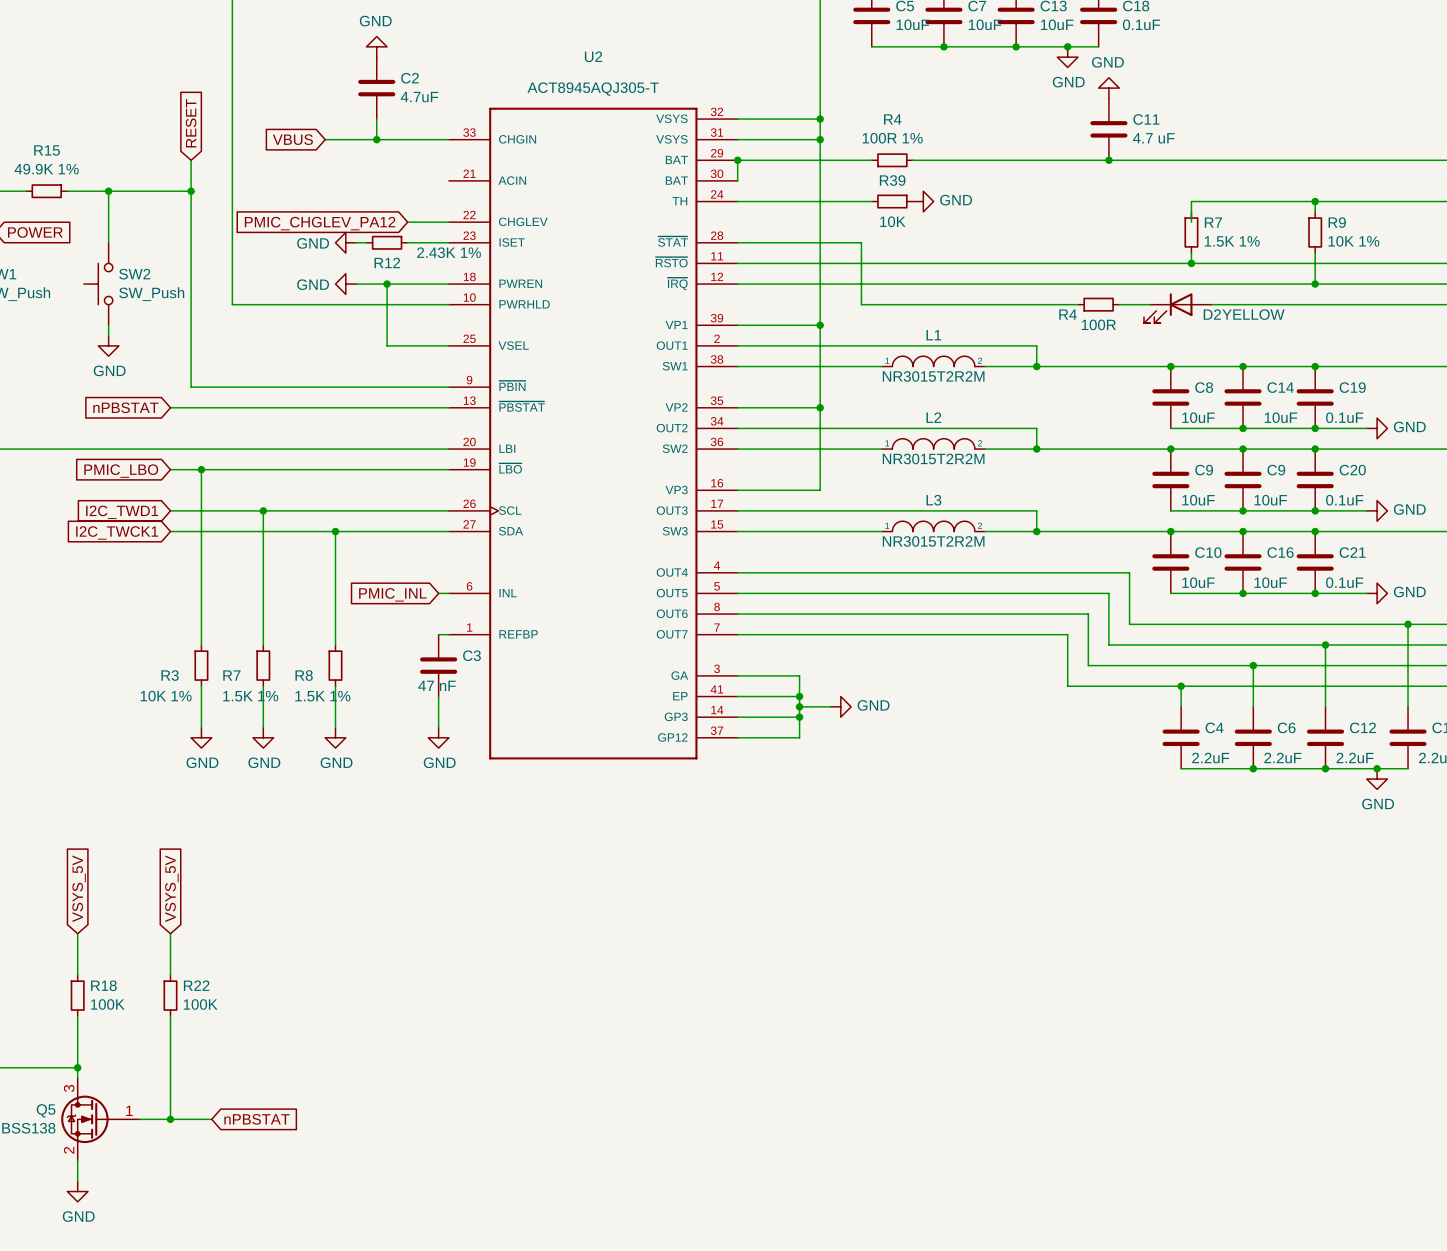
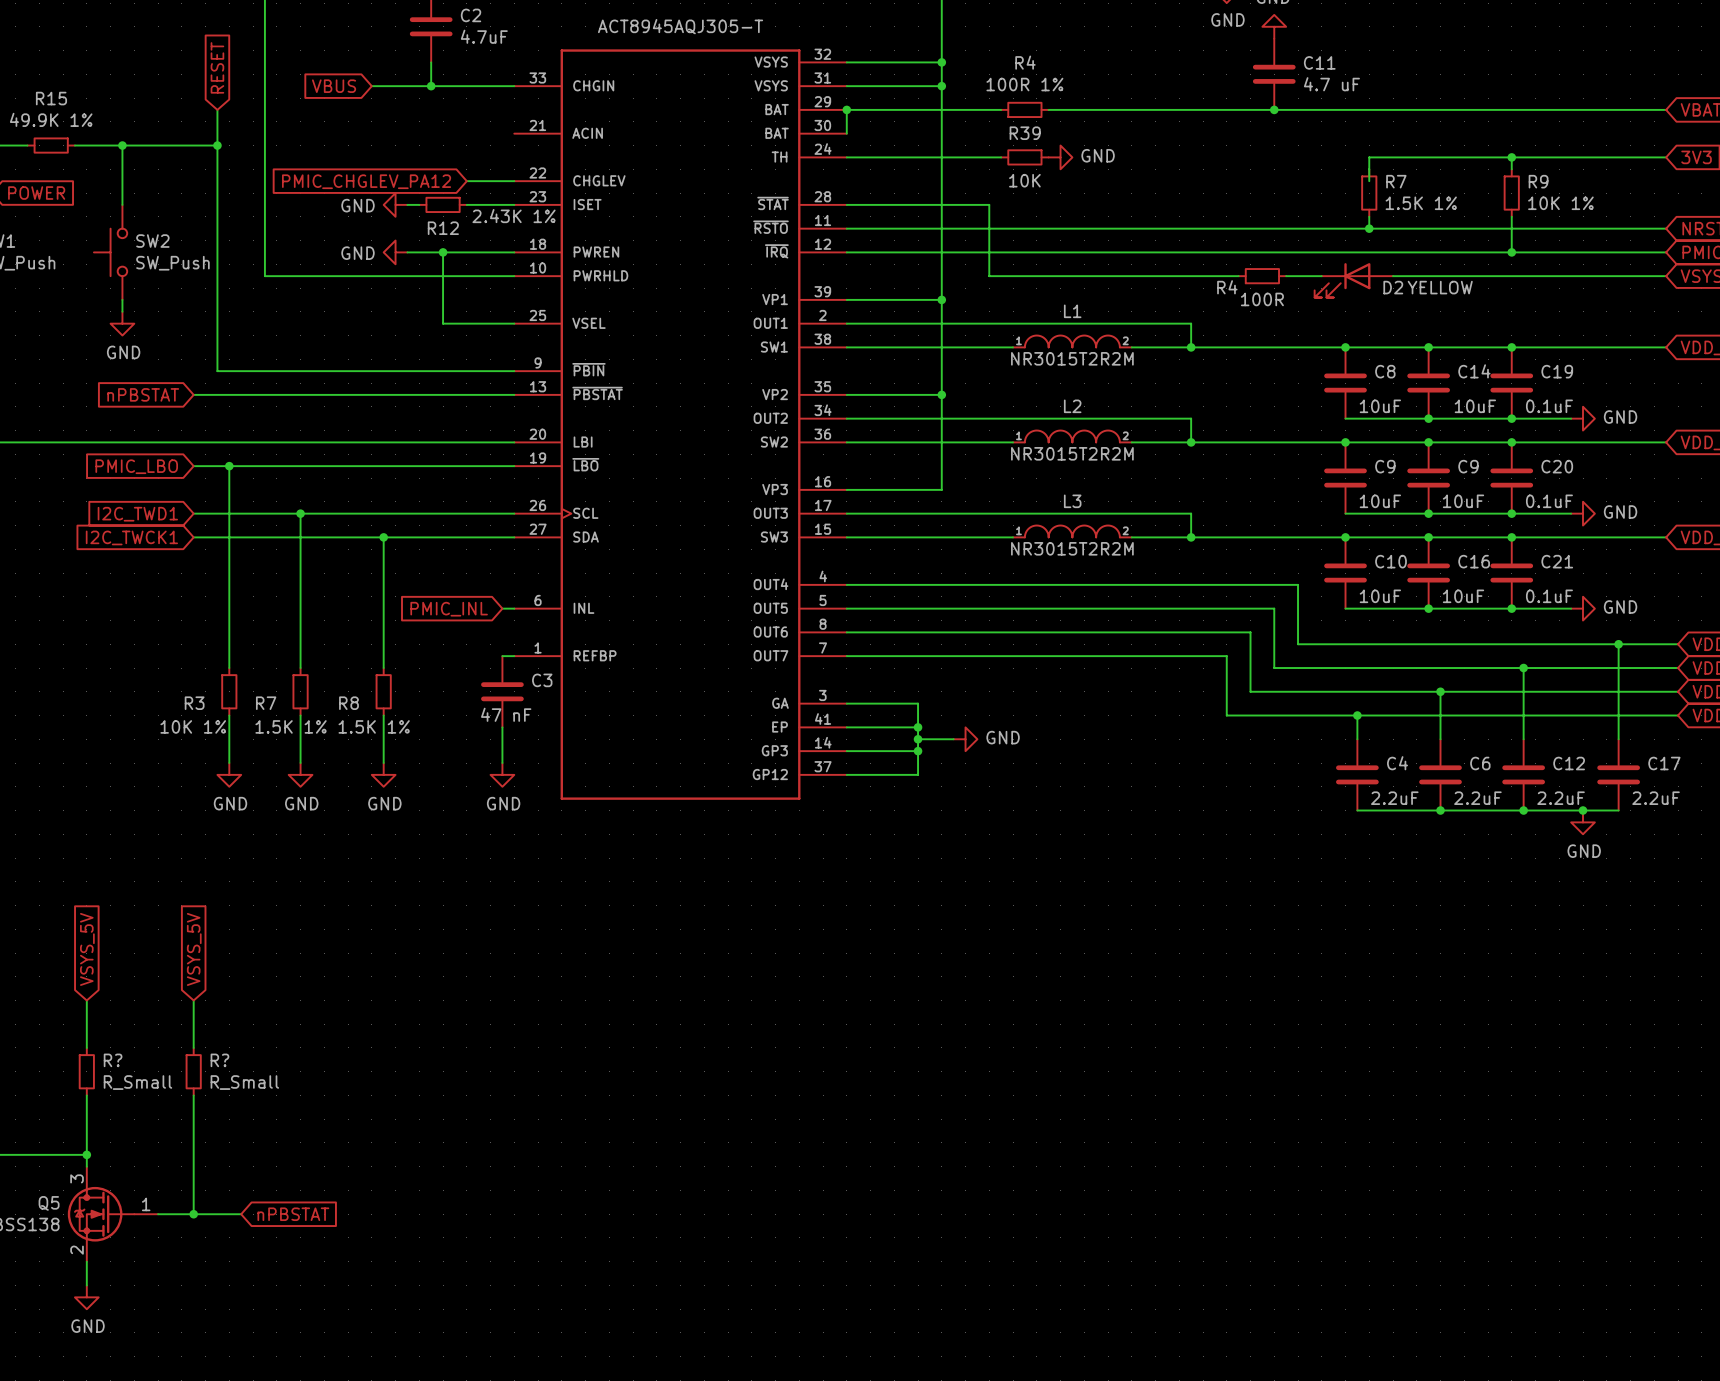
R18 name: R18 (103, 985) -> R? (113, 1060)
R22 name: R22 (196, 985) -> R? (219, 1060)
R18 value: 100K (107, 1004) -> R_Small (137, 1082)
R22 value: 100K (200, 1004) -> R_Small (244, 1082)

